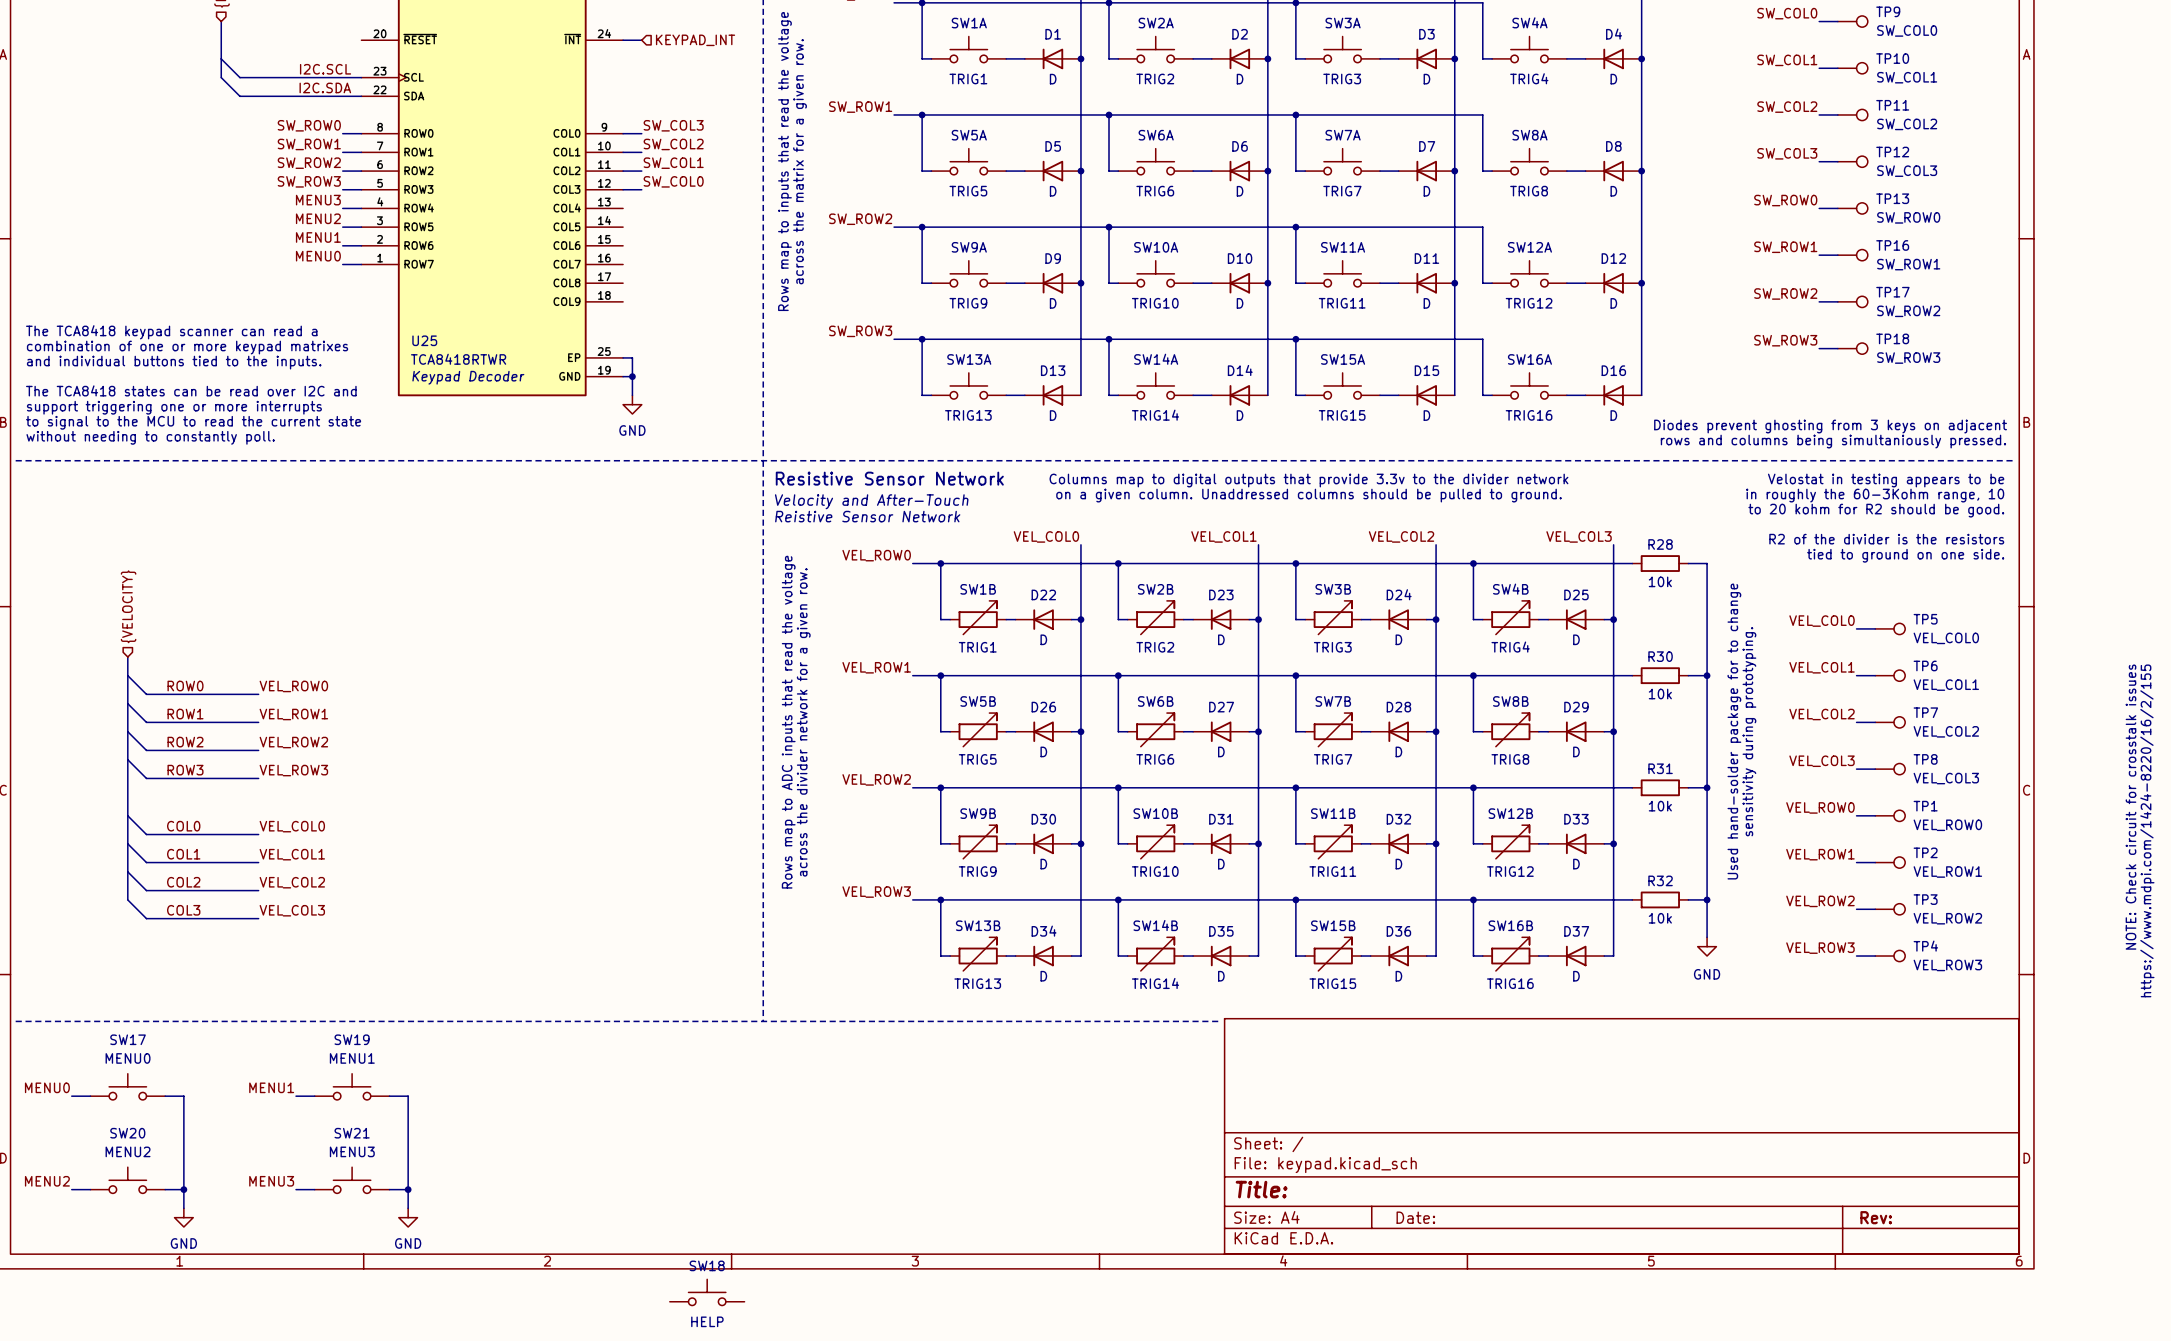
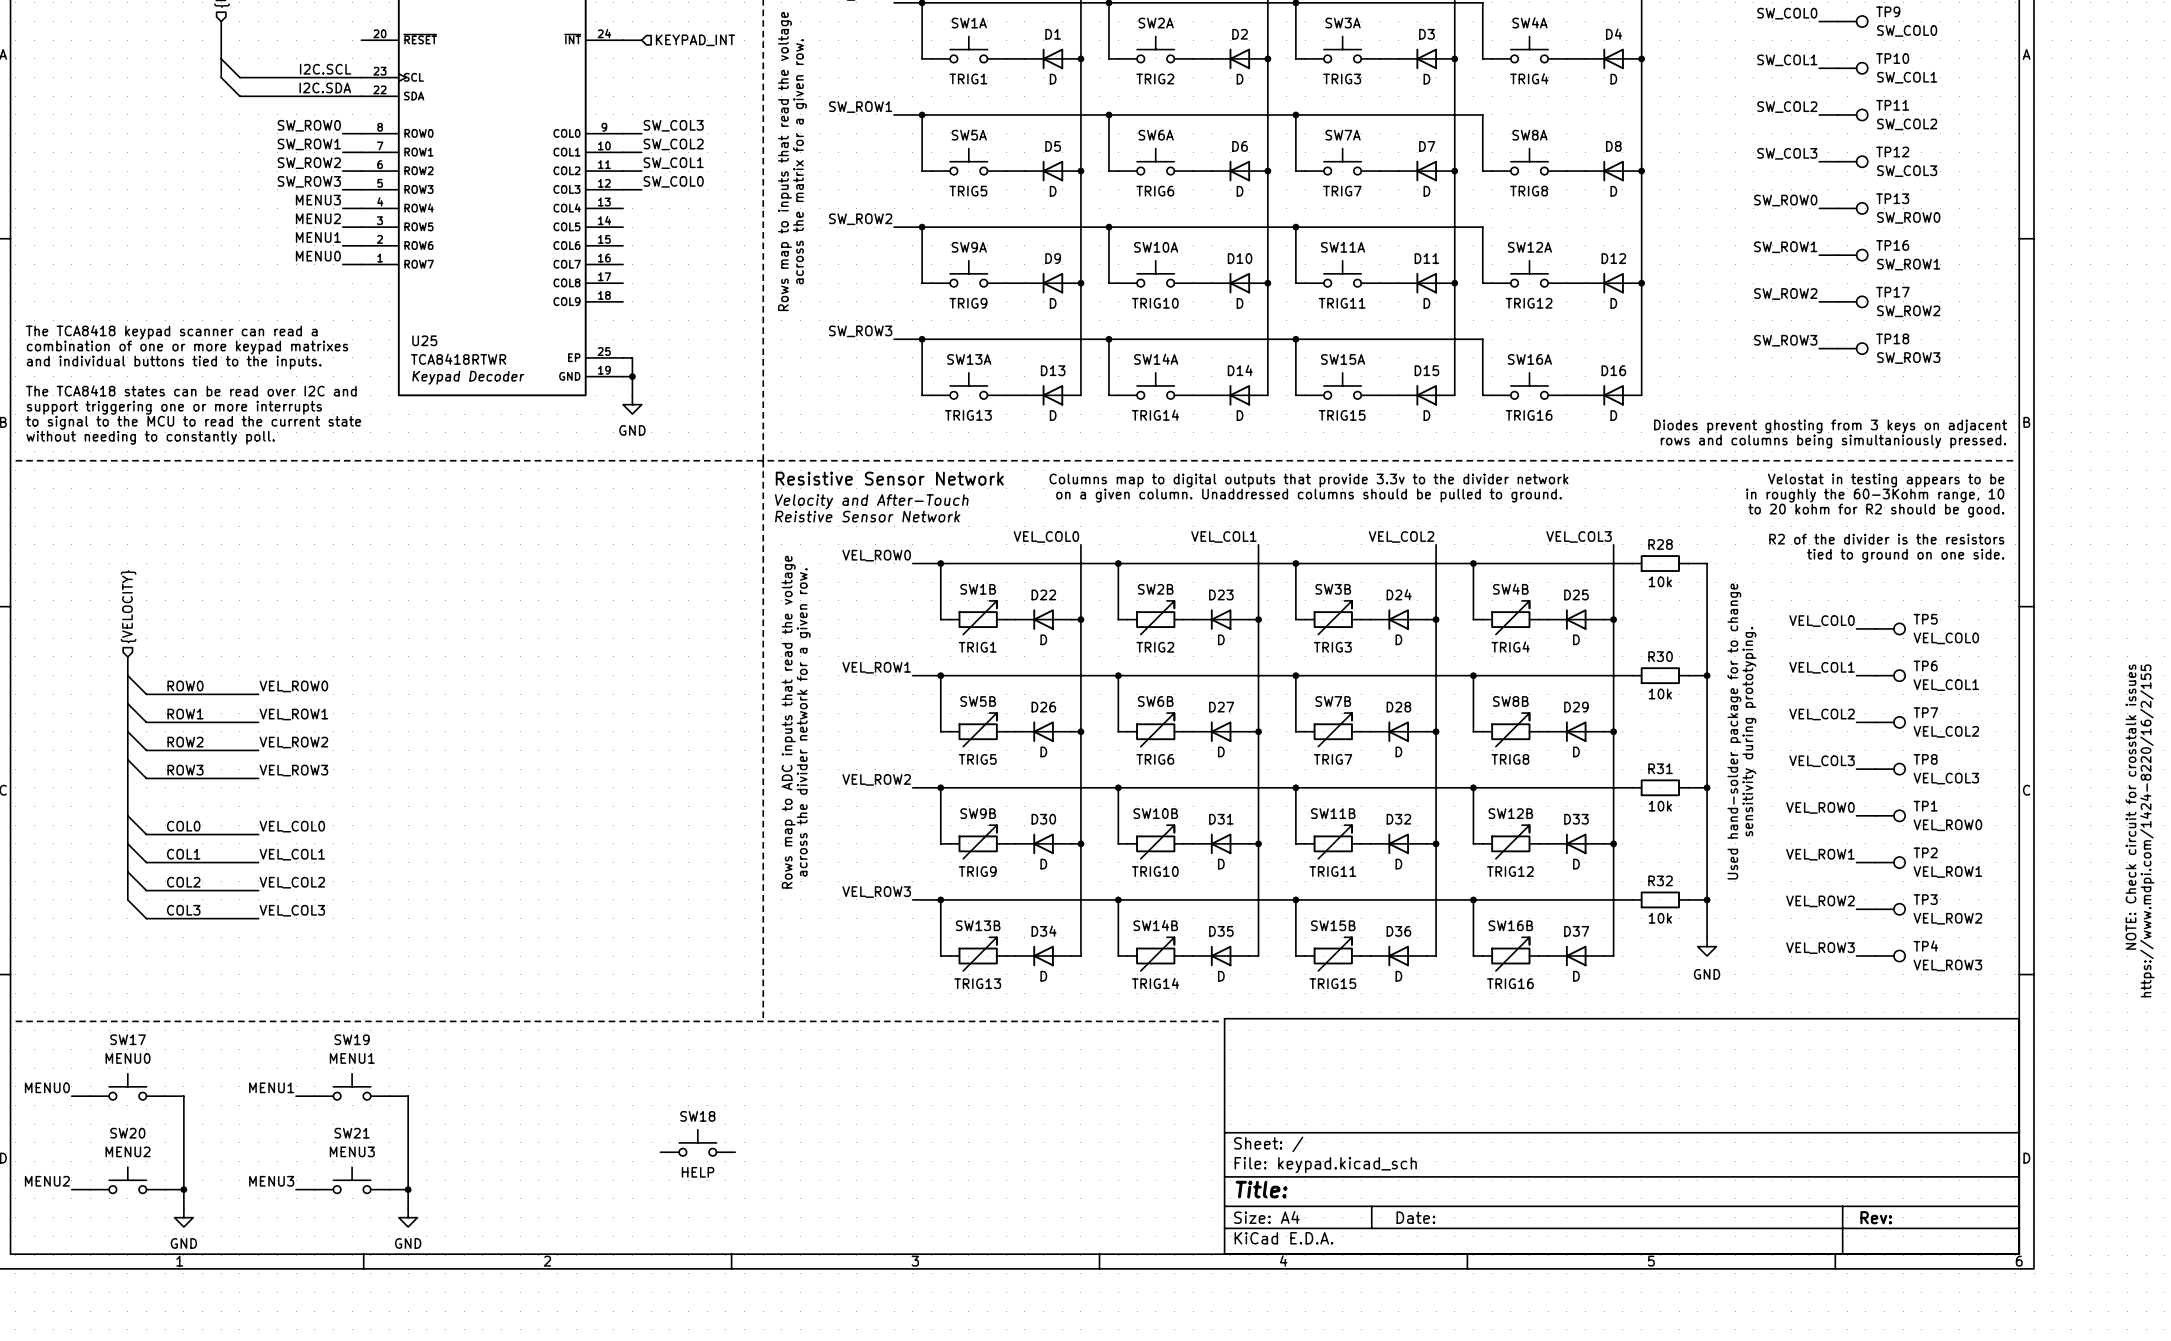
SW18 position: (707, 1292) -> (697, 1142)

